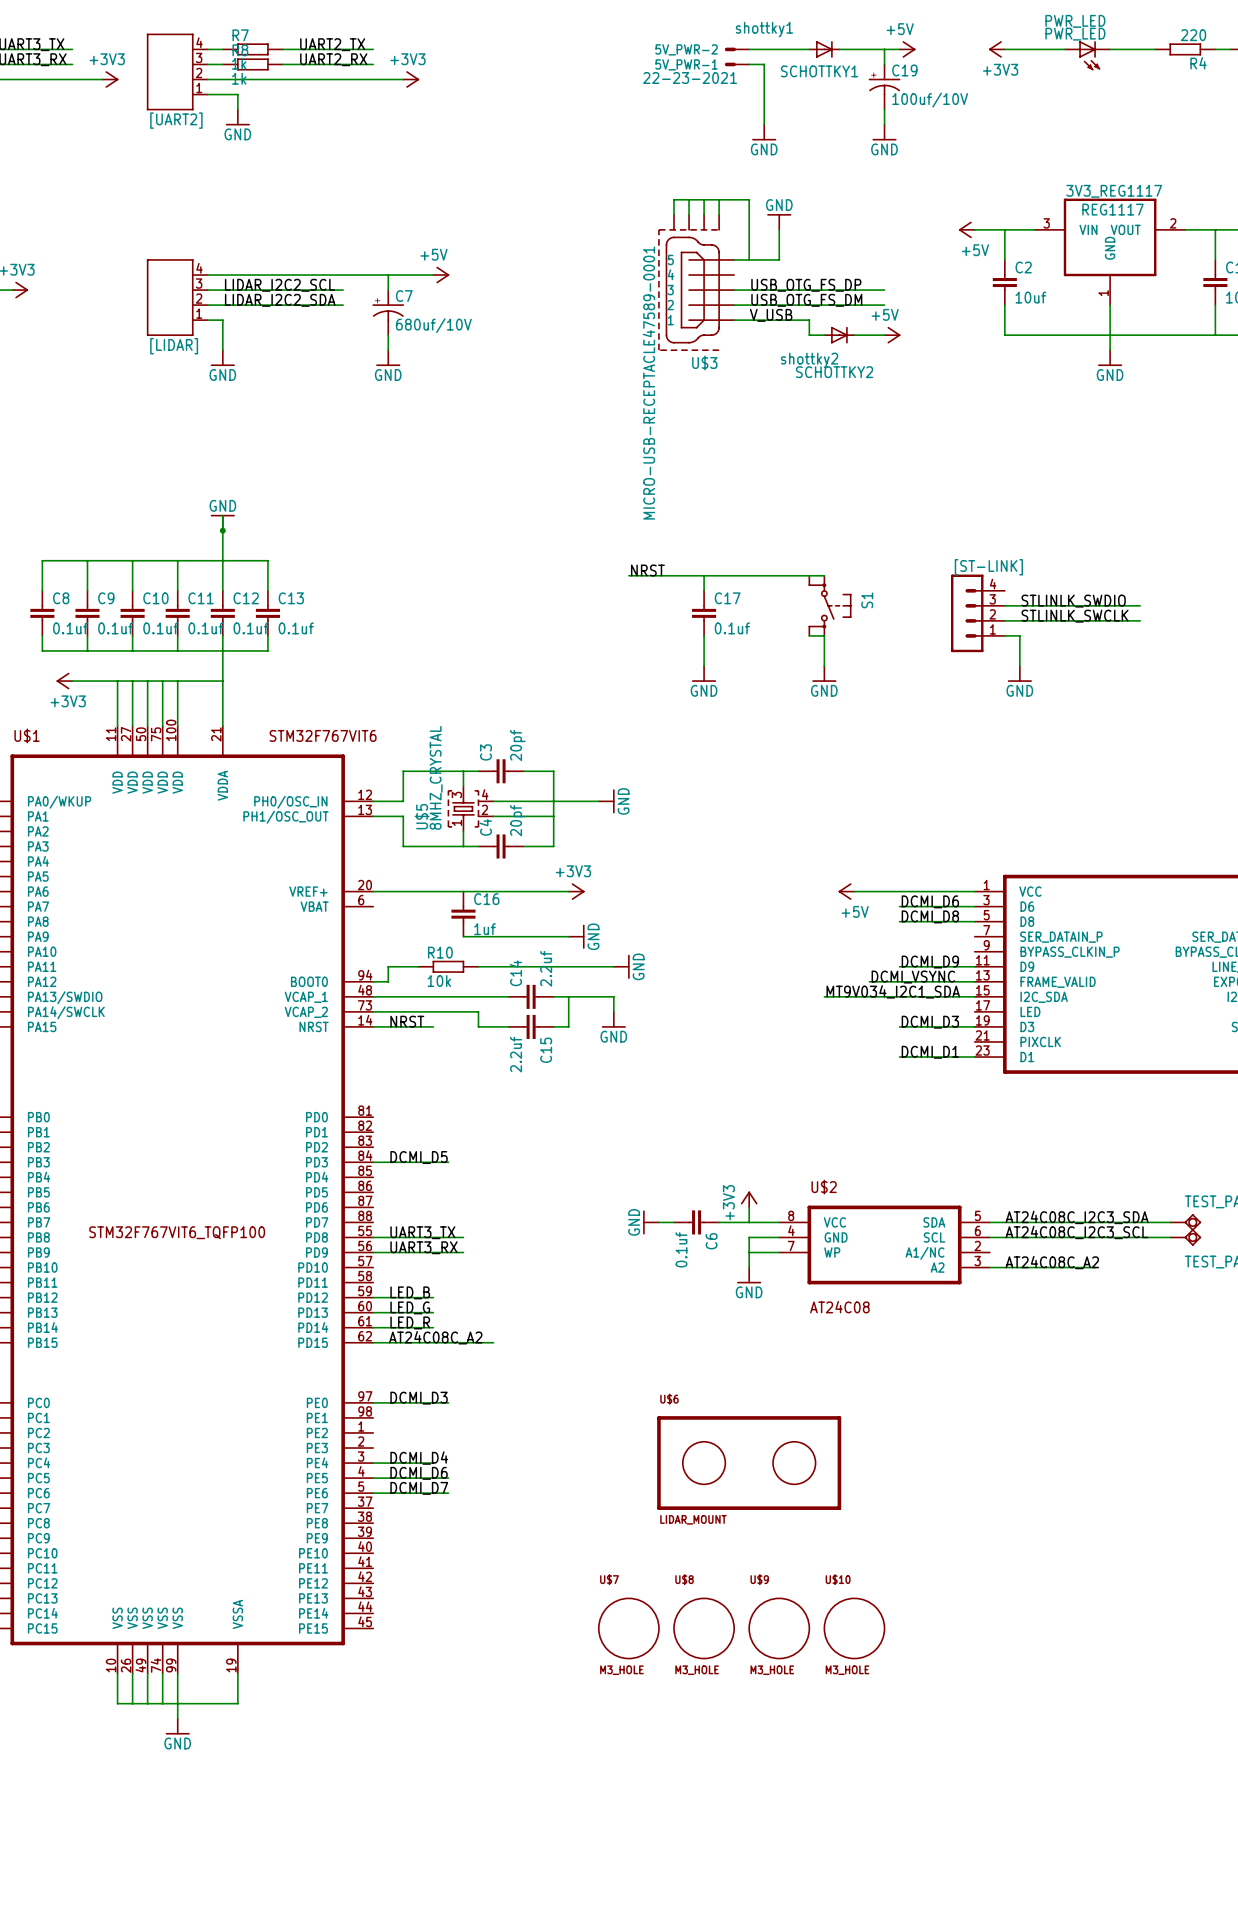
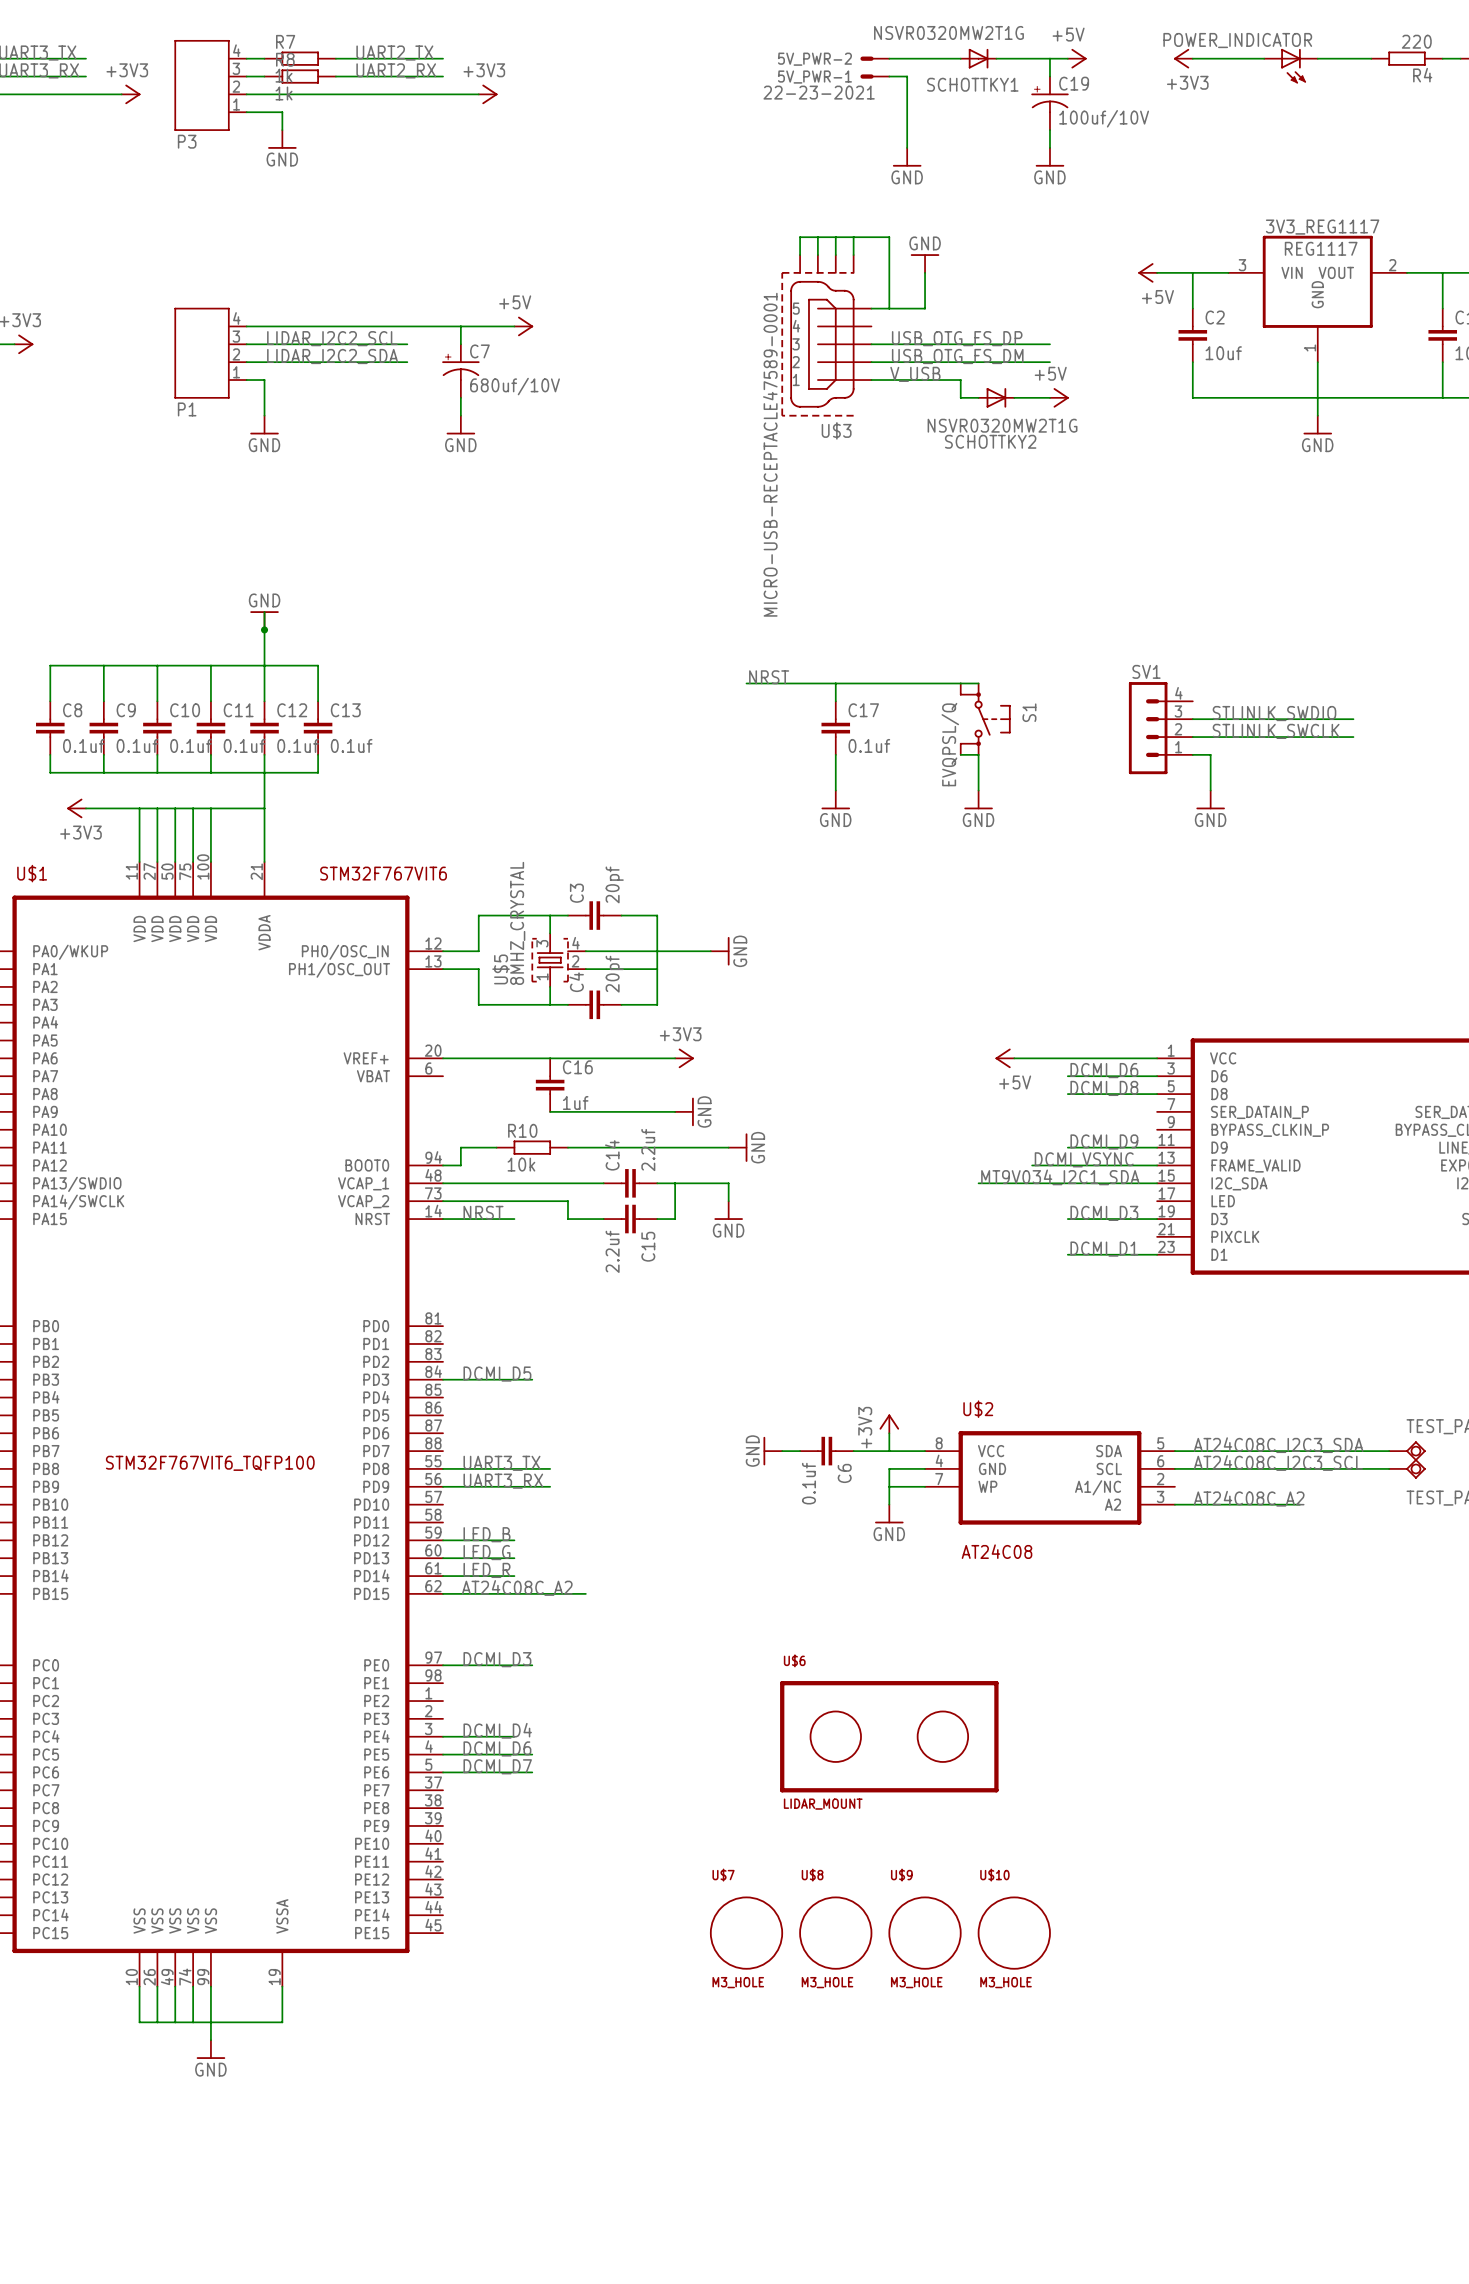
PWR_LED value: PWR_LED (1075, 21) -> none
SCHOTTKY1 value: shottky1 (764, 29) -> NSVR0320MW2T1G (948, 32)
PWR_LED name: PWR_LED (1075, 34) -> POWER_INDICATOR (1237, 40)
[UART2] name: [UART2] (176, 120) -> P3 (187, 141)
[LIDAR] name: [LIDAR] (174, 346) -> P1 (187, 409)
SCHOTTKY2 value: shottky2 (809, 360) -> NSVR0320MW2T1G (1002, 425)
[ST-LINK] name: [ST-LINK] (988, 567) -> SV1 (1146, 671)
S1 value: none -> EVQPSL/Q (950, 744)

